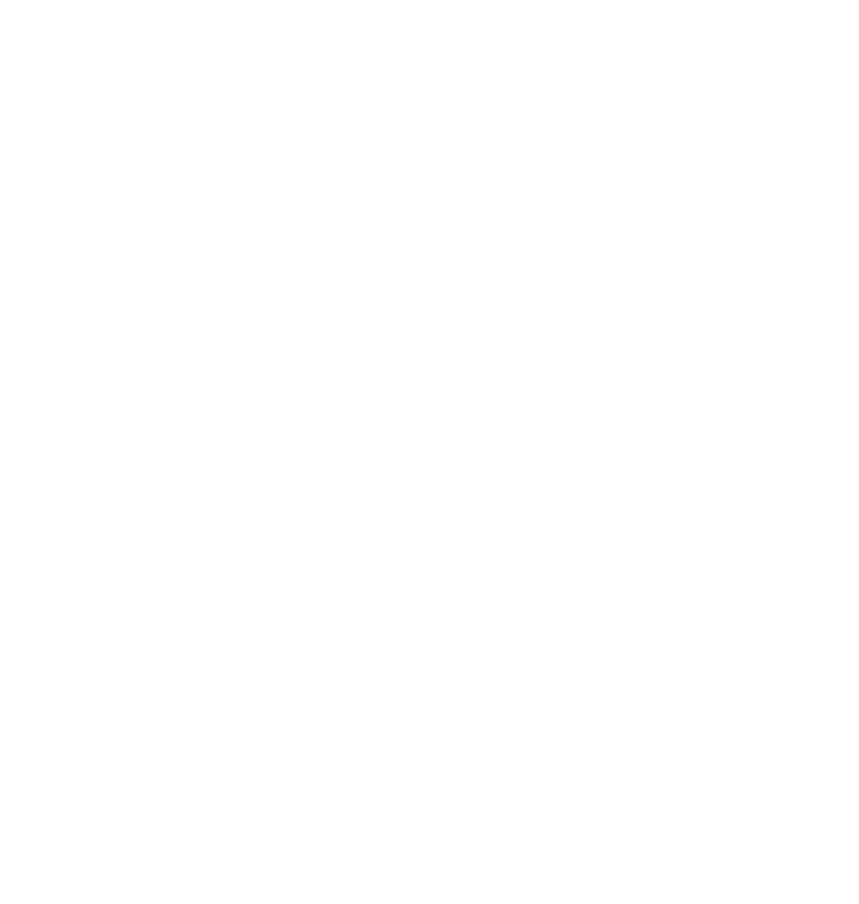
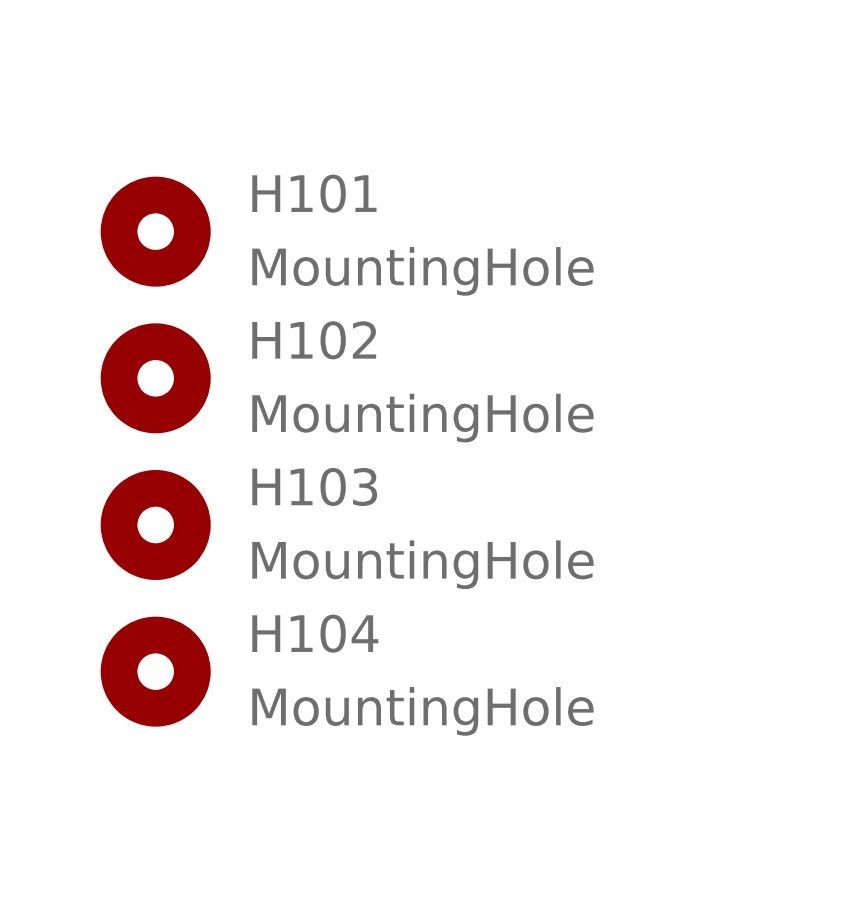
H101: none -> MountingHole (155, 231)
H102: none -> MountingHole (155, 378)
H103: none -> MountingHole (155, 524)
H104: none -> MountingHole (155, 671)

